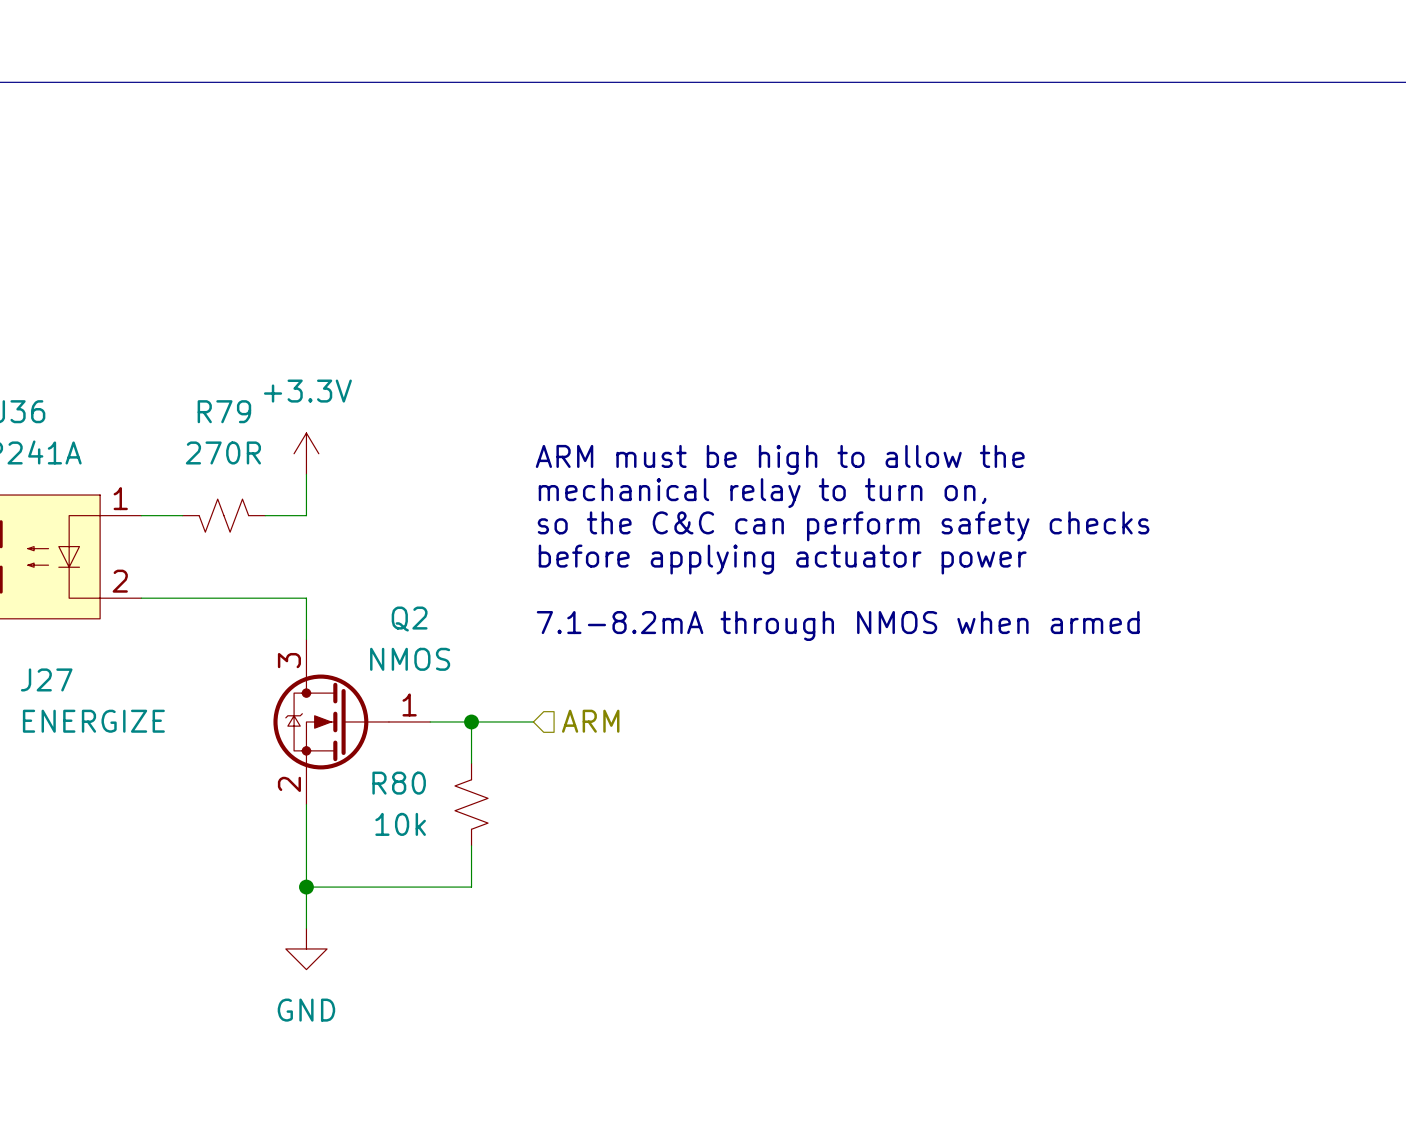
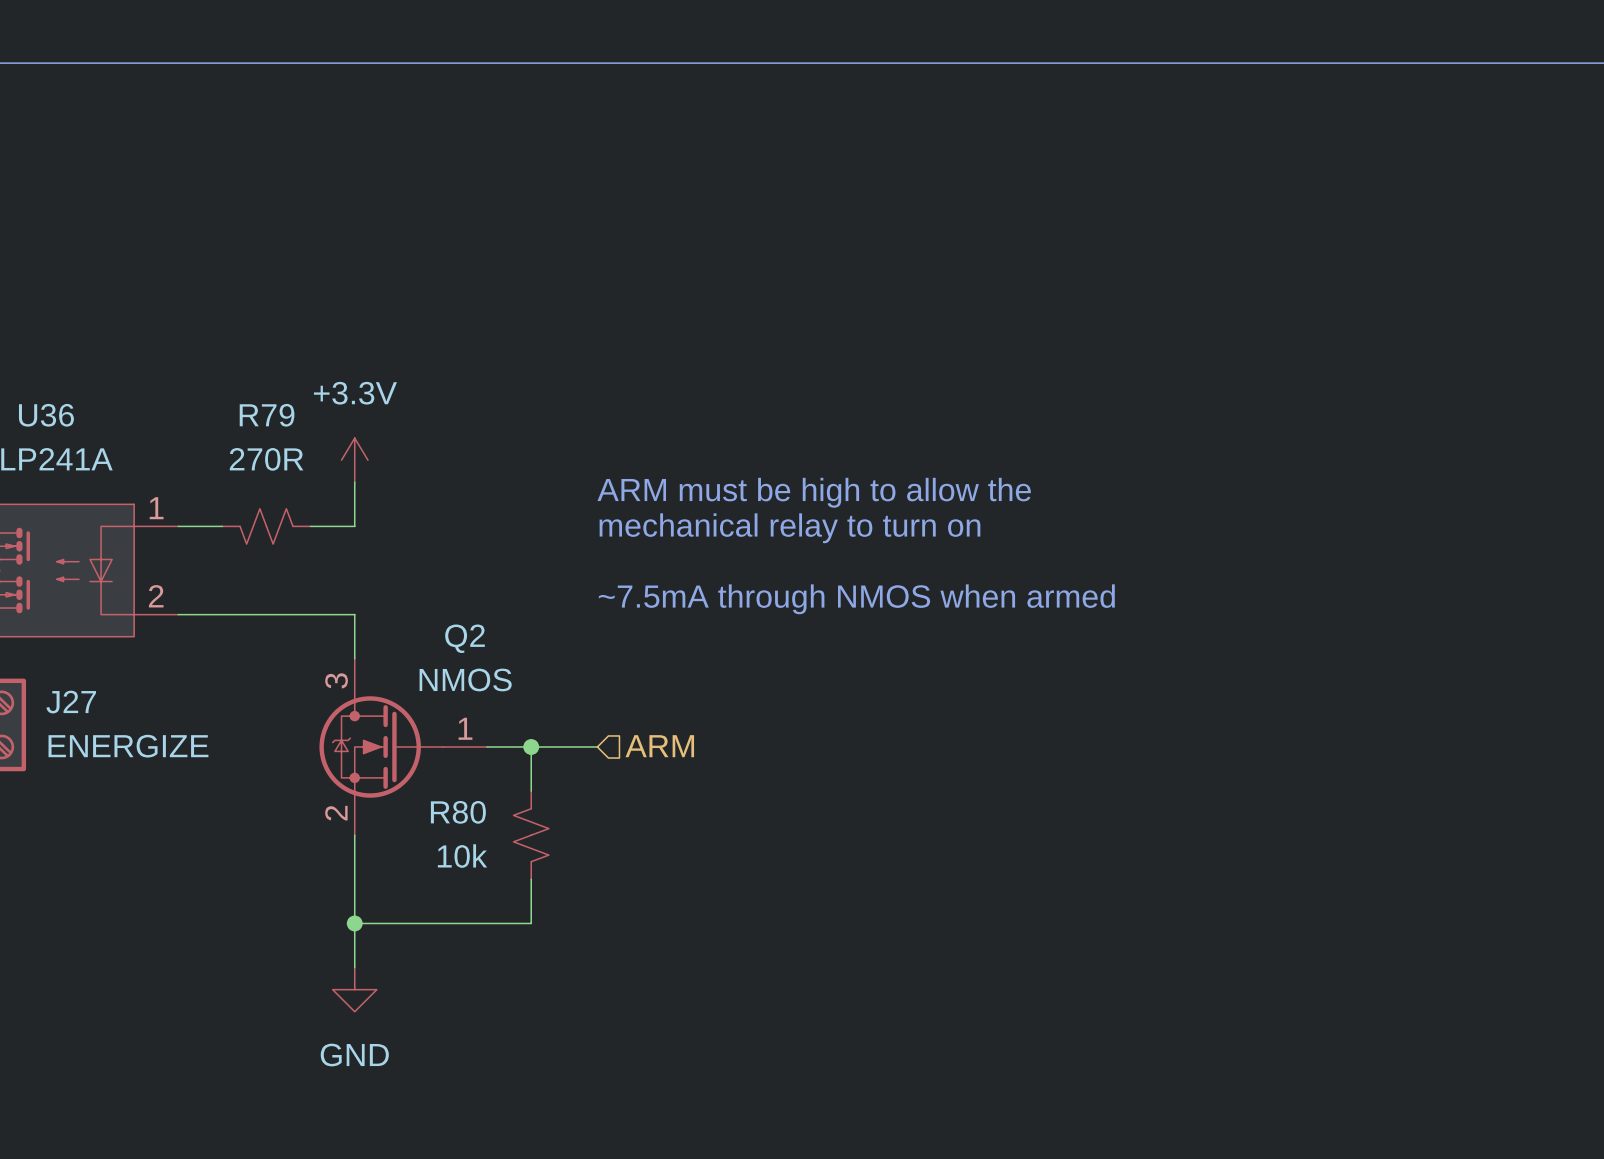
text: ARM must be high to allow the (780, 459) -> none
text: mechanical relay to turn on, (762, 493) -> ARM must be high to allow the (814, 492)
text: so the C&C can perform safety checks (843, 526) -> mechanical relay to turn on (789, 528)
text: before applying actuator power (782, 559) -> none
text: 7.1-8.2mA through NMOS when armed (838, 625) -> ~7.5mA through NMOS when armed (856, 599)

